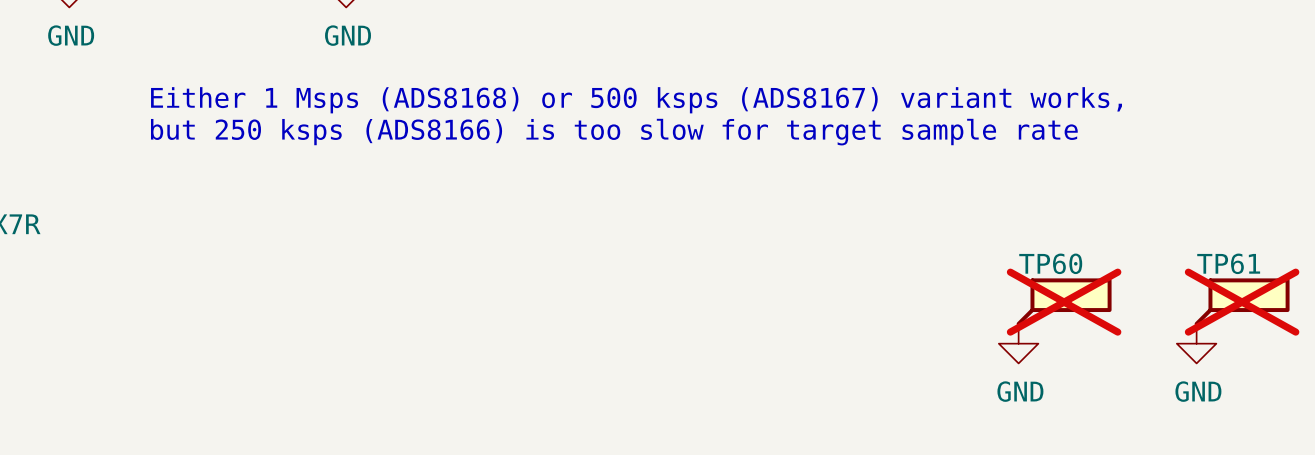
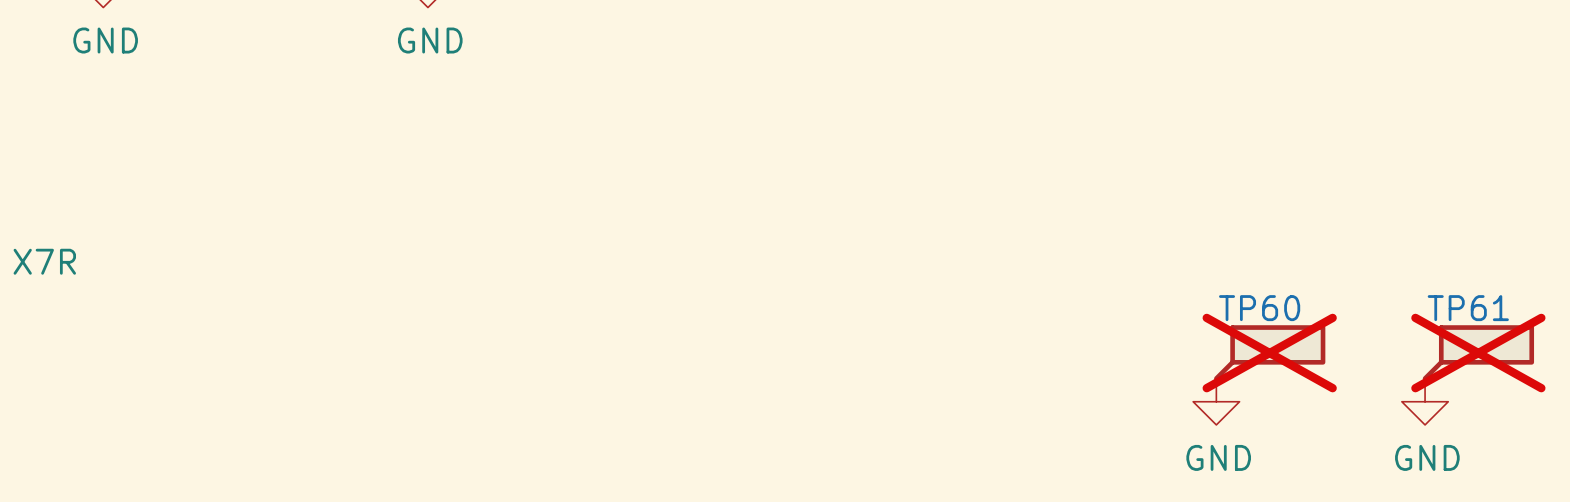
text: Either 1 Msps (ADS8168) or 500 ksps (ADS8167) variant works, (636, 100) -> none
text: but 250 ksps (ADS8166) is too slow for target sample rate (614, 132) -> none

